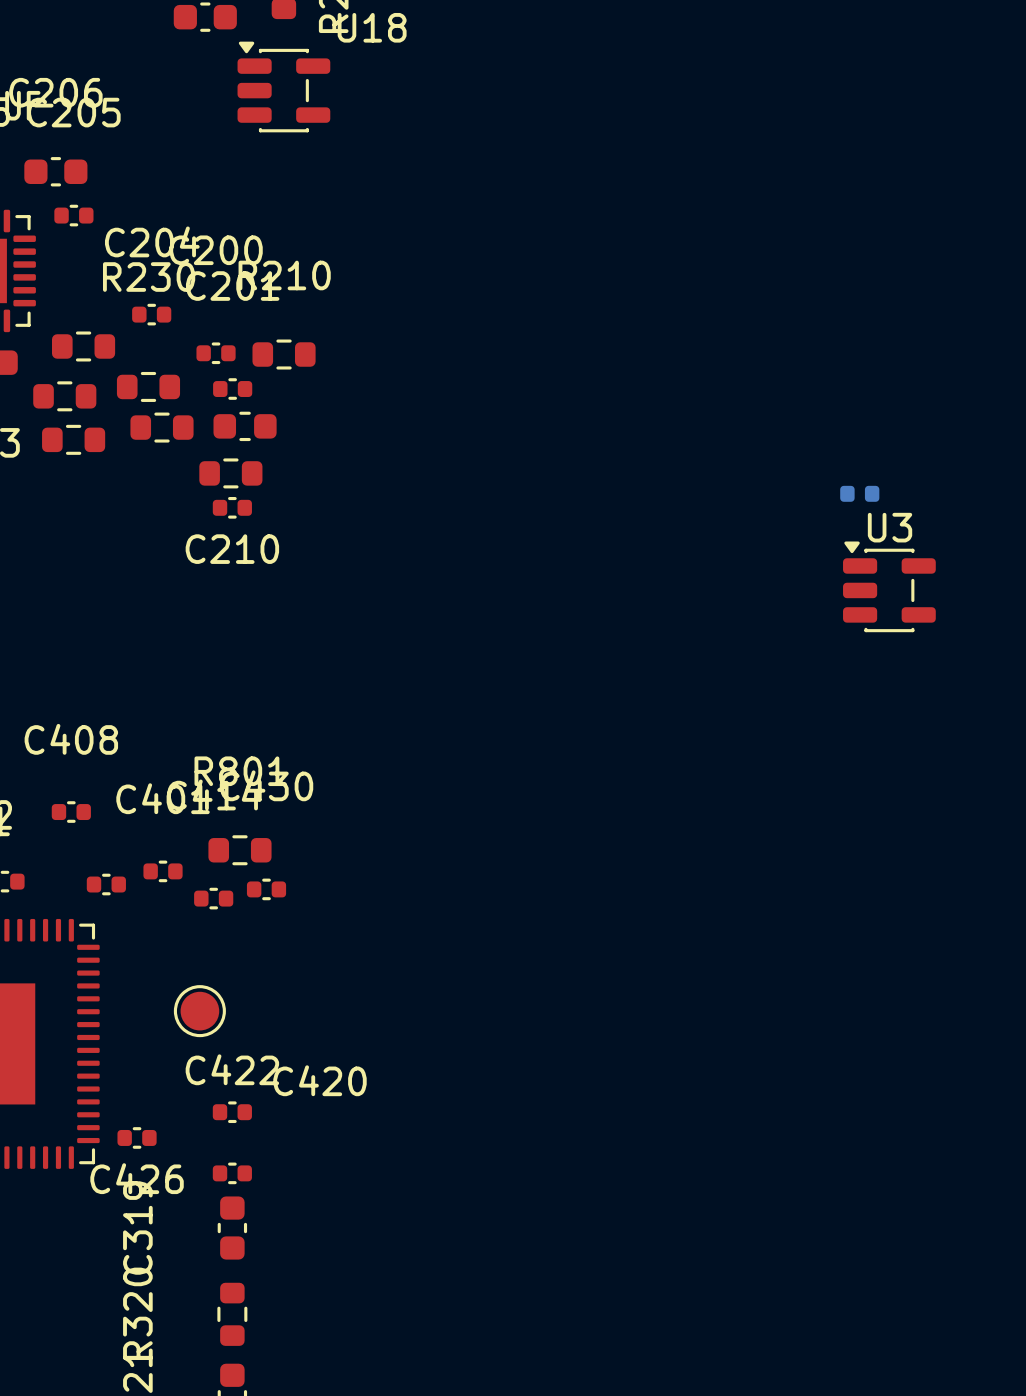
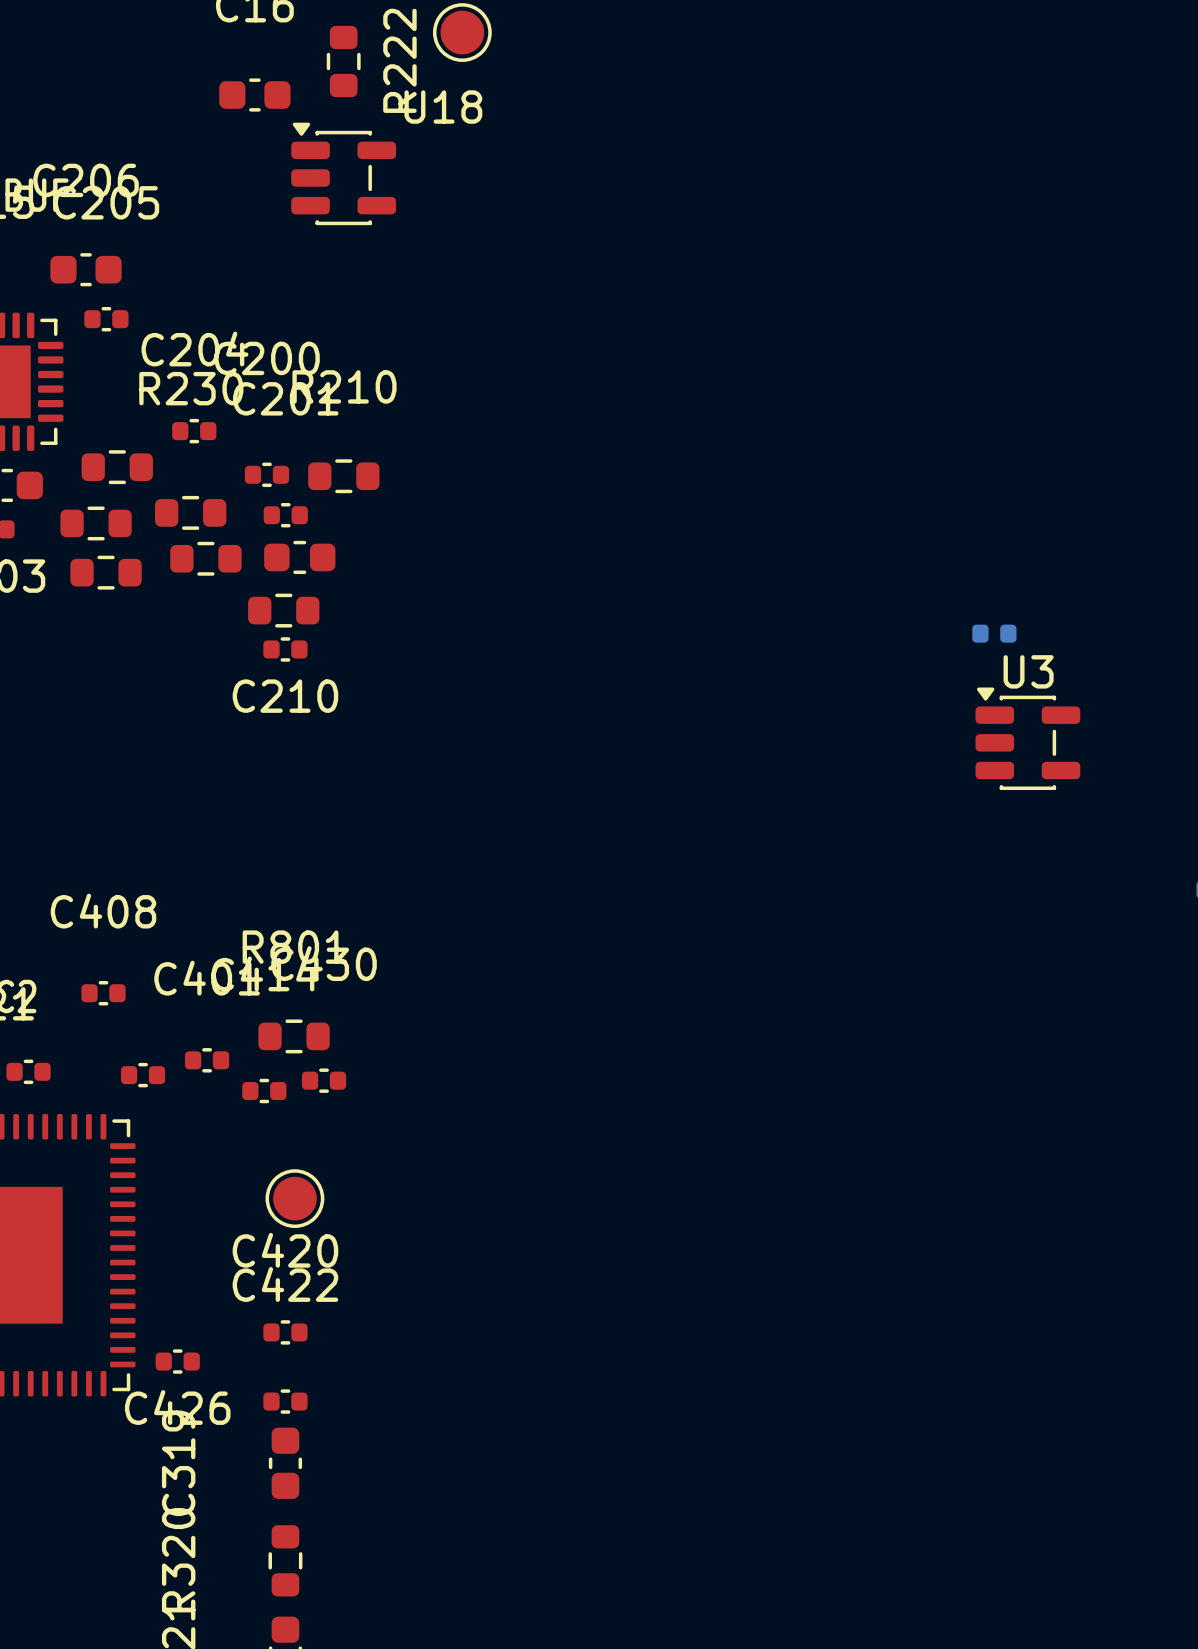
part position: (199, 1011) -> (294, 1198)
C420 name position: C420 (319, 1080) -> C420 (285, 1250)

